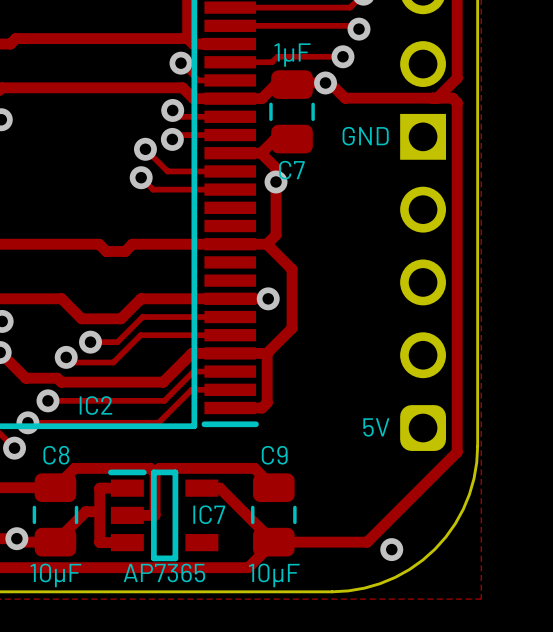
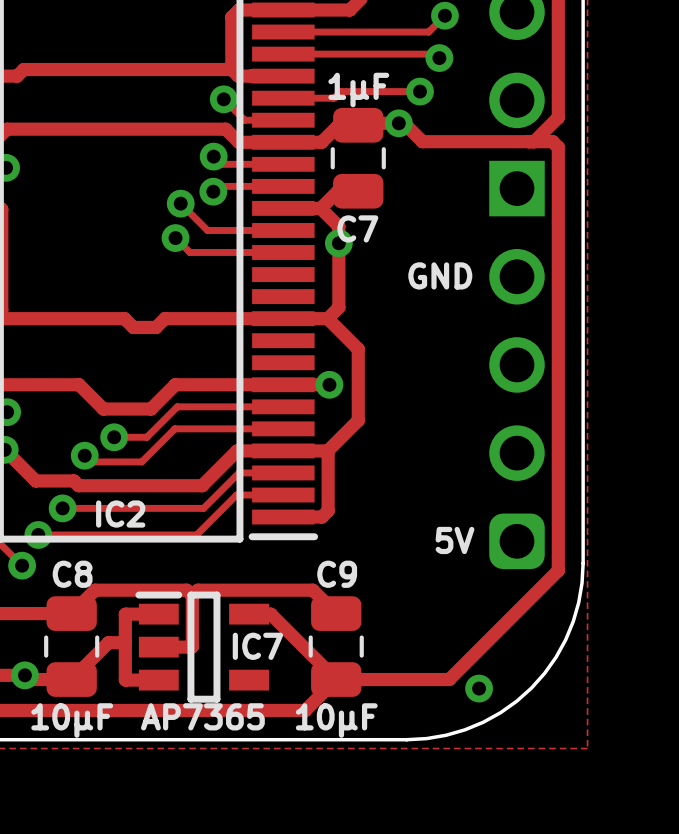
text position: GND (365, 136) -> GND (440, 275)

